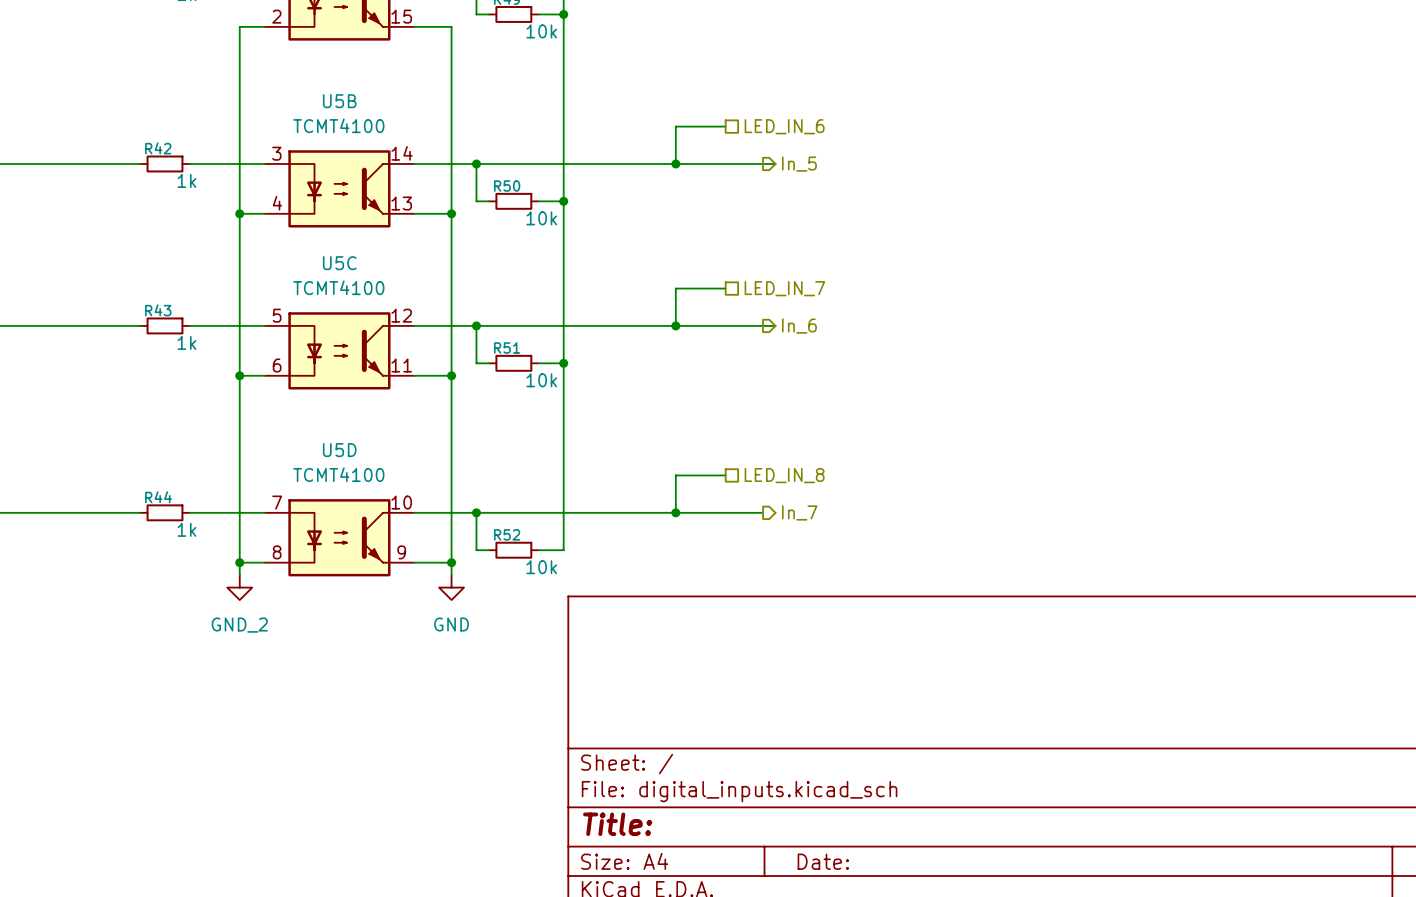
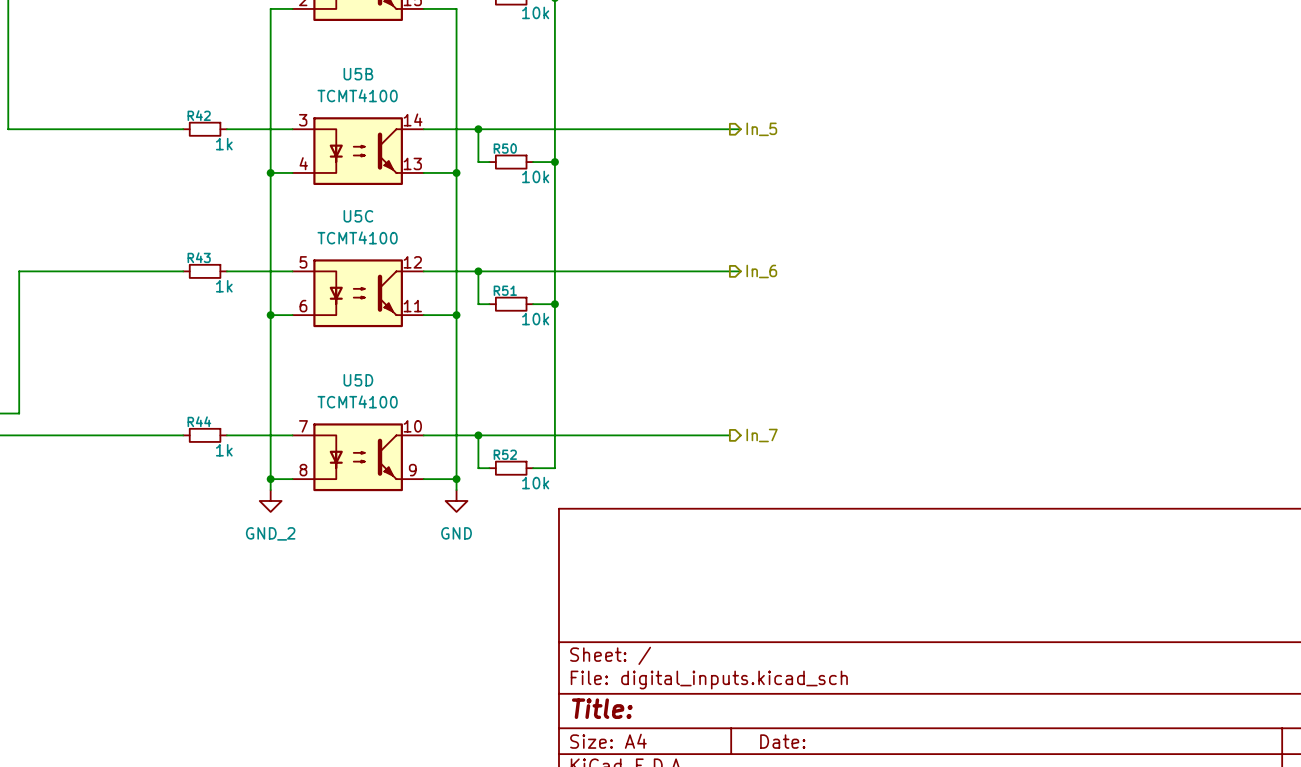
wire: (725, 126) (675, 126) (675, 163) -> none
hierarchical label: LED_IN_6 (784, 126) -> none
junction: (675, 163) -> none
wire: (725, 288) (675, 288) (675, 325) -> none
hierarchical label: LED_IN_7 (784, 288) -> none
junction: (675, 325) -> none
wire: (725, 475) (675, 475) (675, 512) -> none
hierarchical label: LED_IN_8 (784, 475) -> none
junction: (675, 512) -> none

